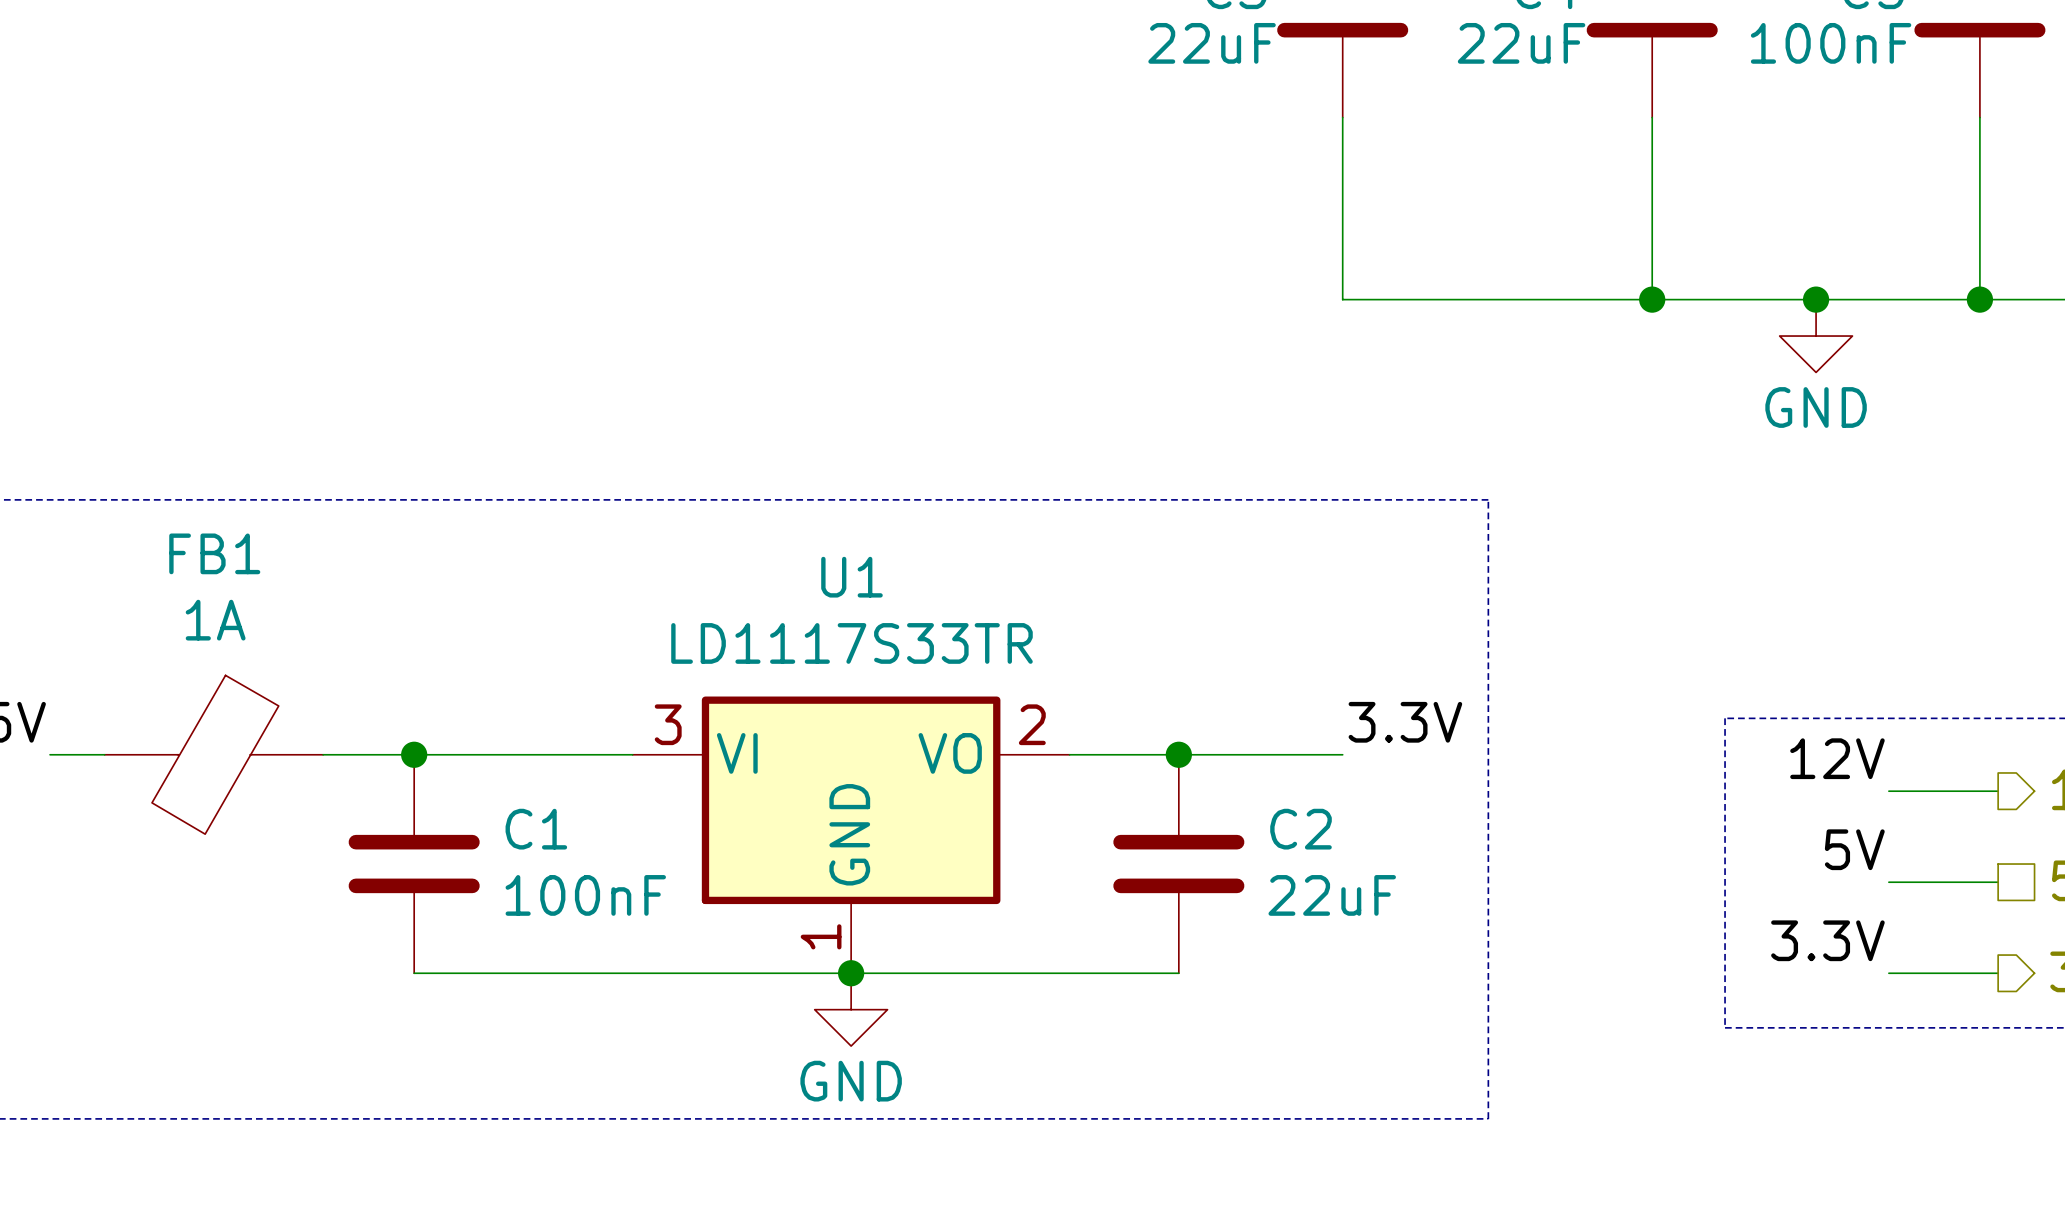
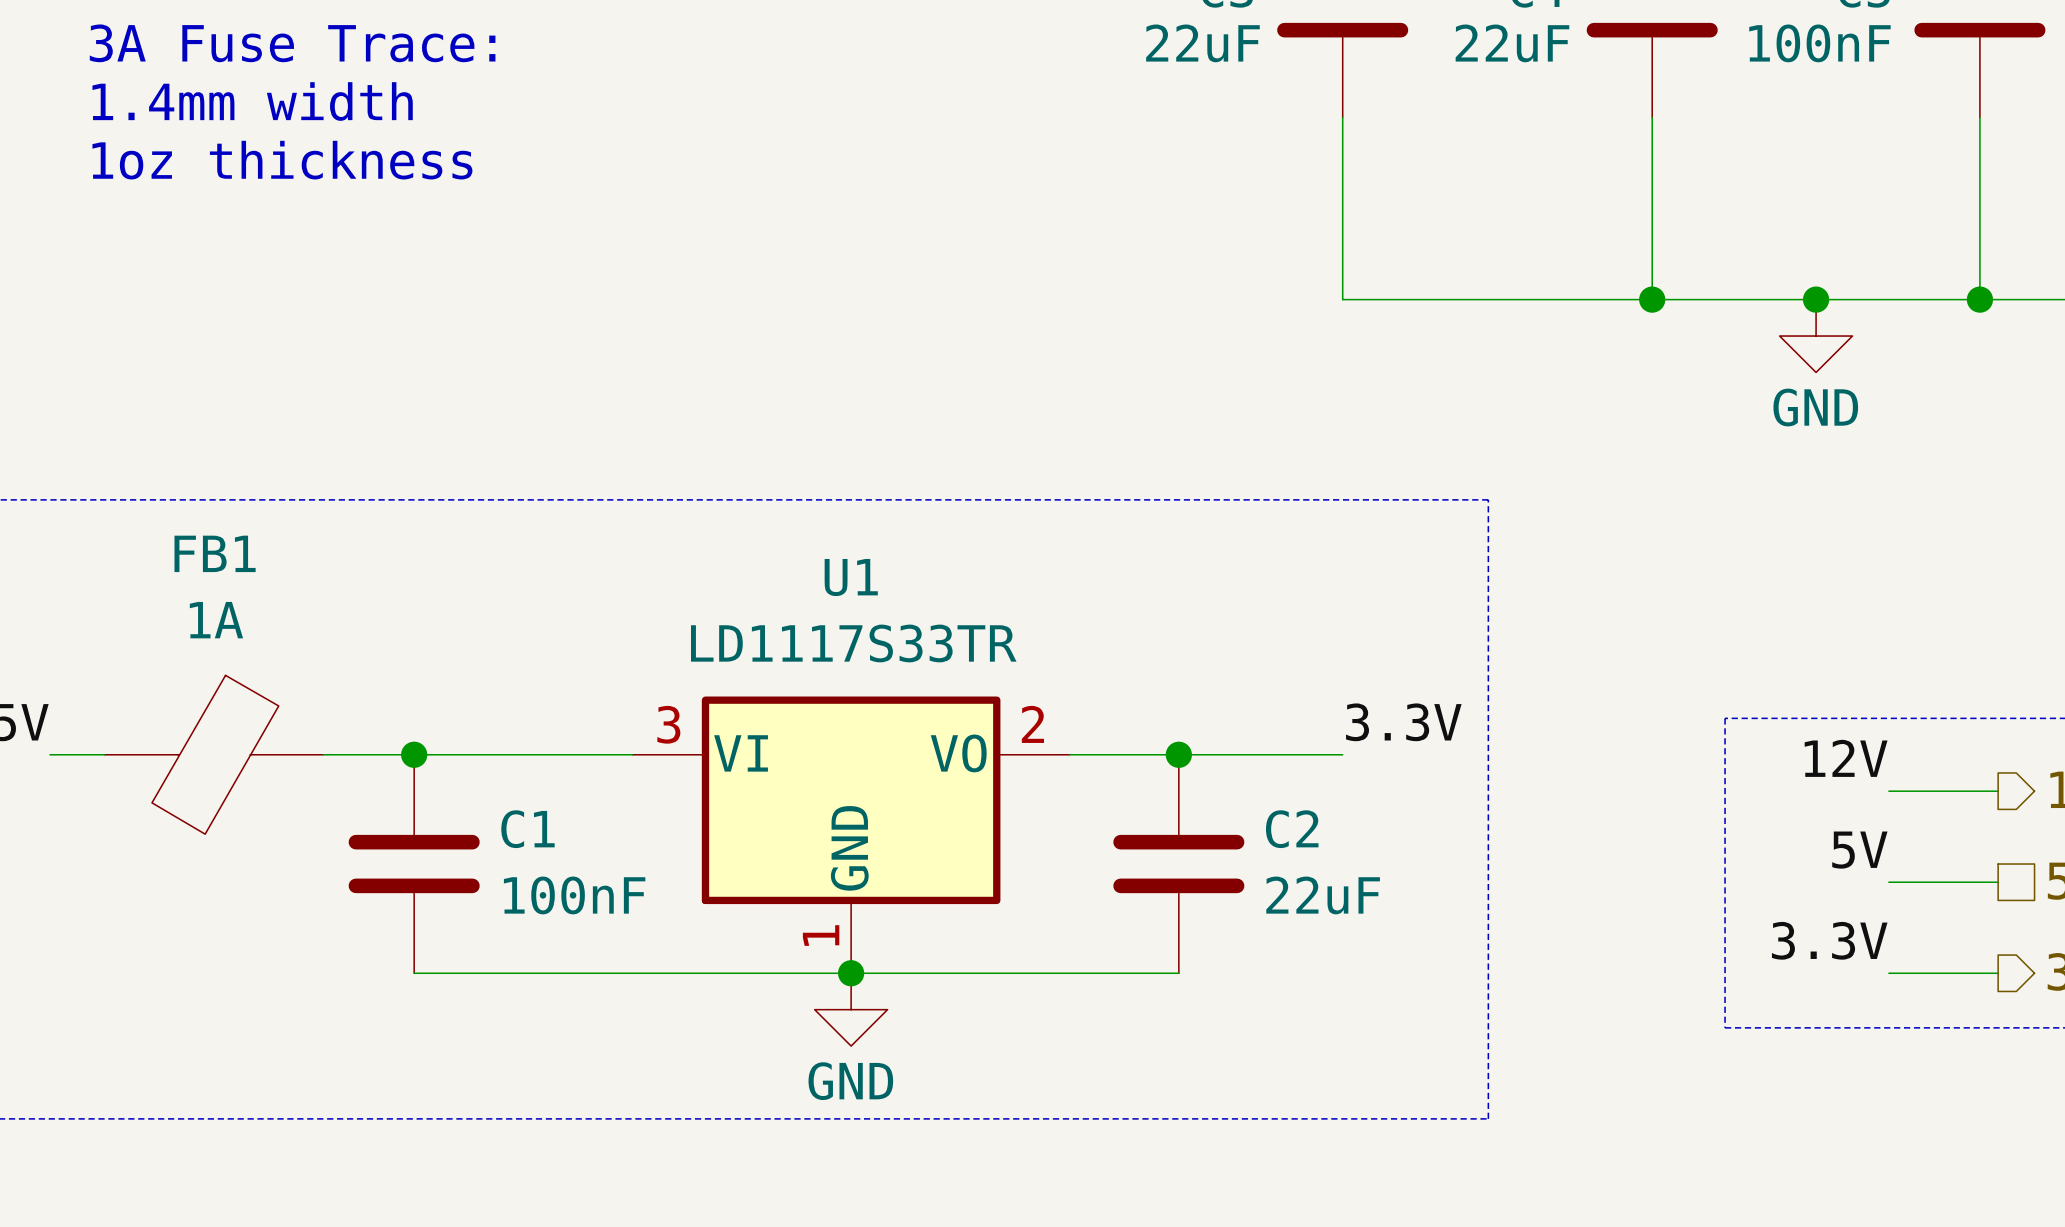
text: none -> 3A Fuse Trace: (292, 43)
text: none -> 1.4mm width (252, 101)
text: none -> 1oz thickness (282, 160)

